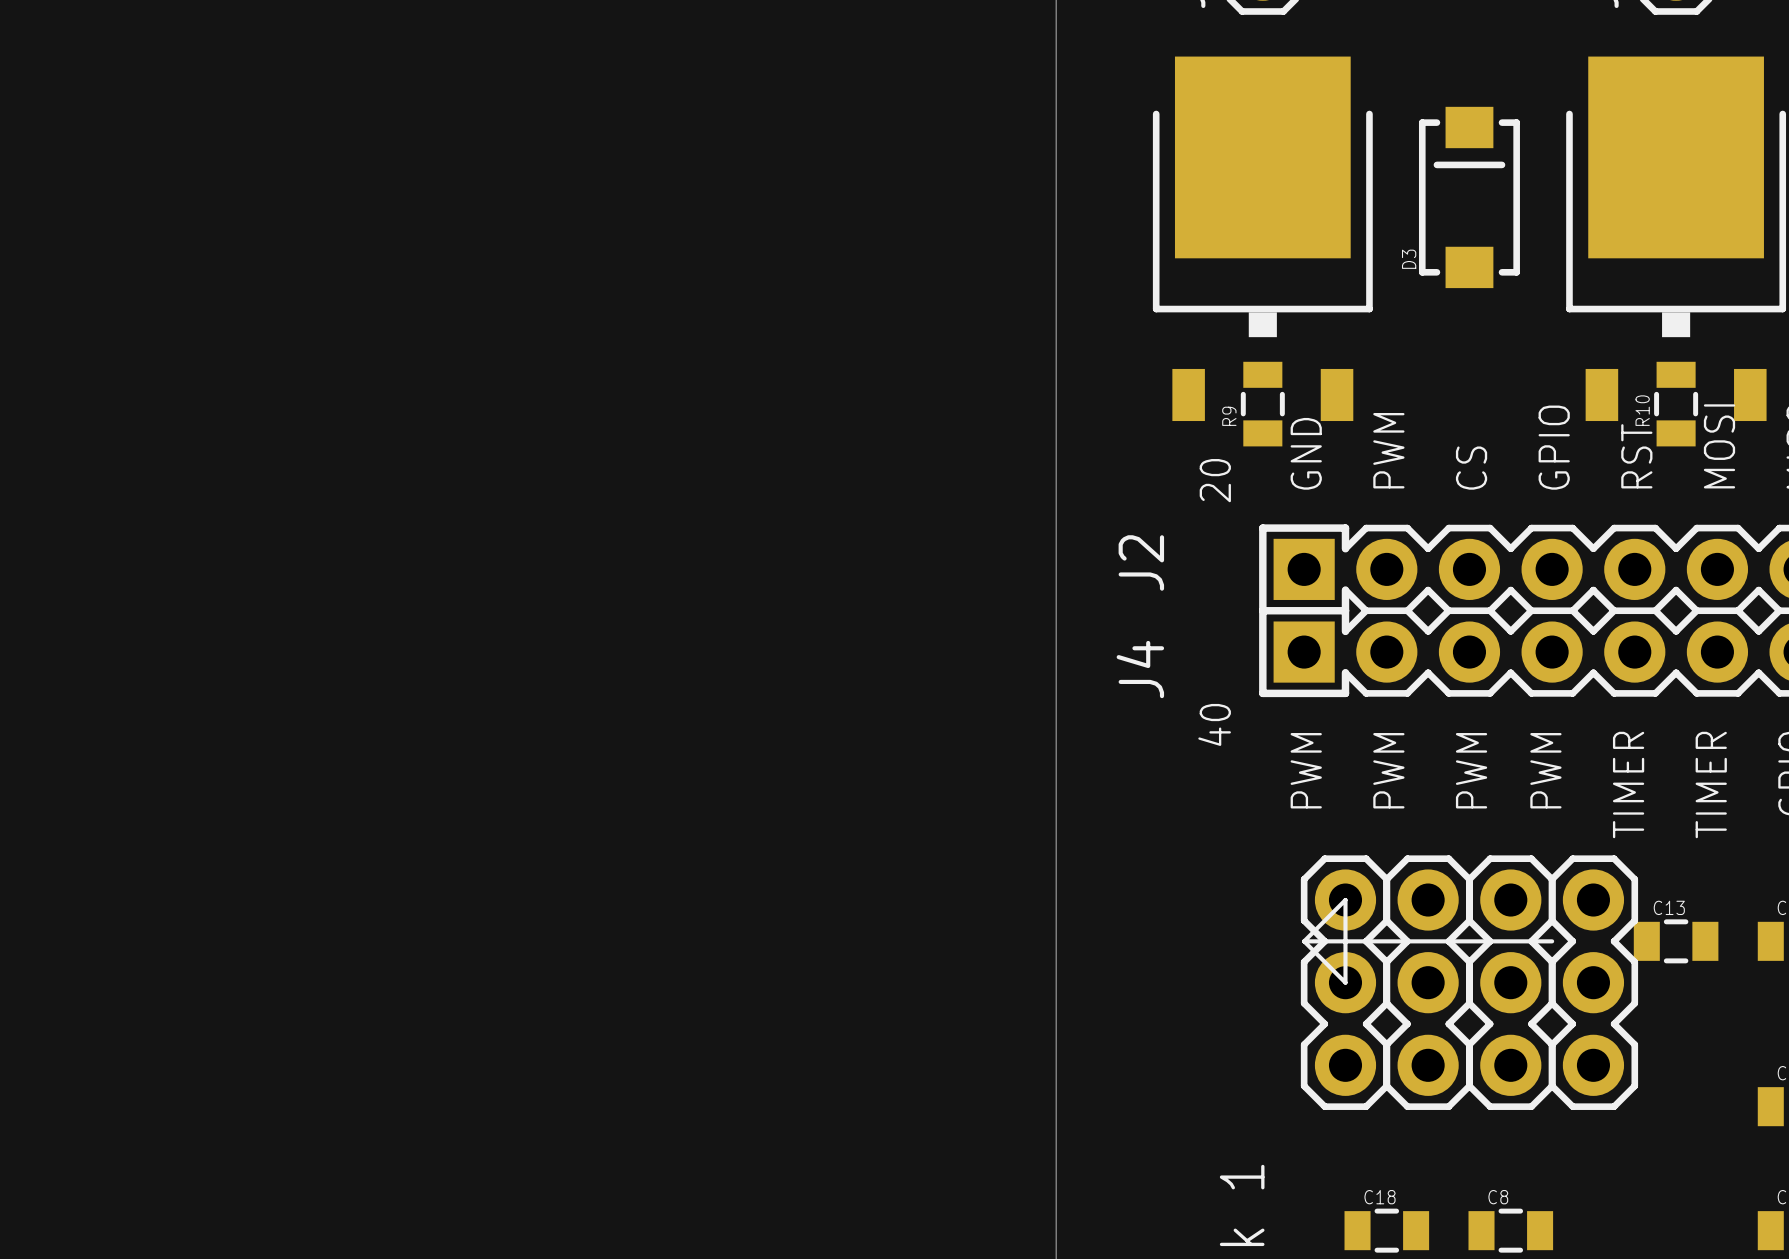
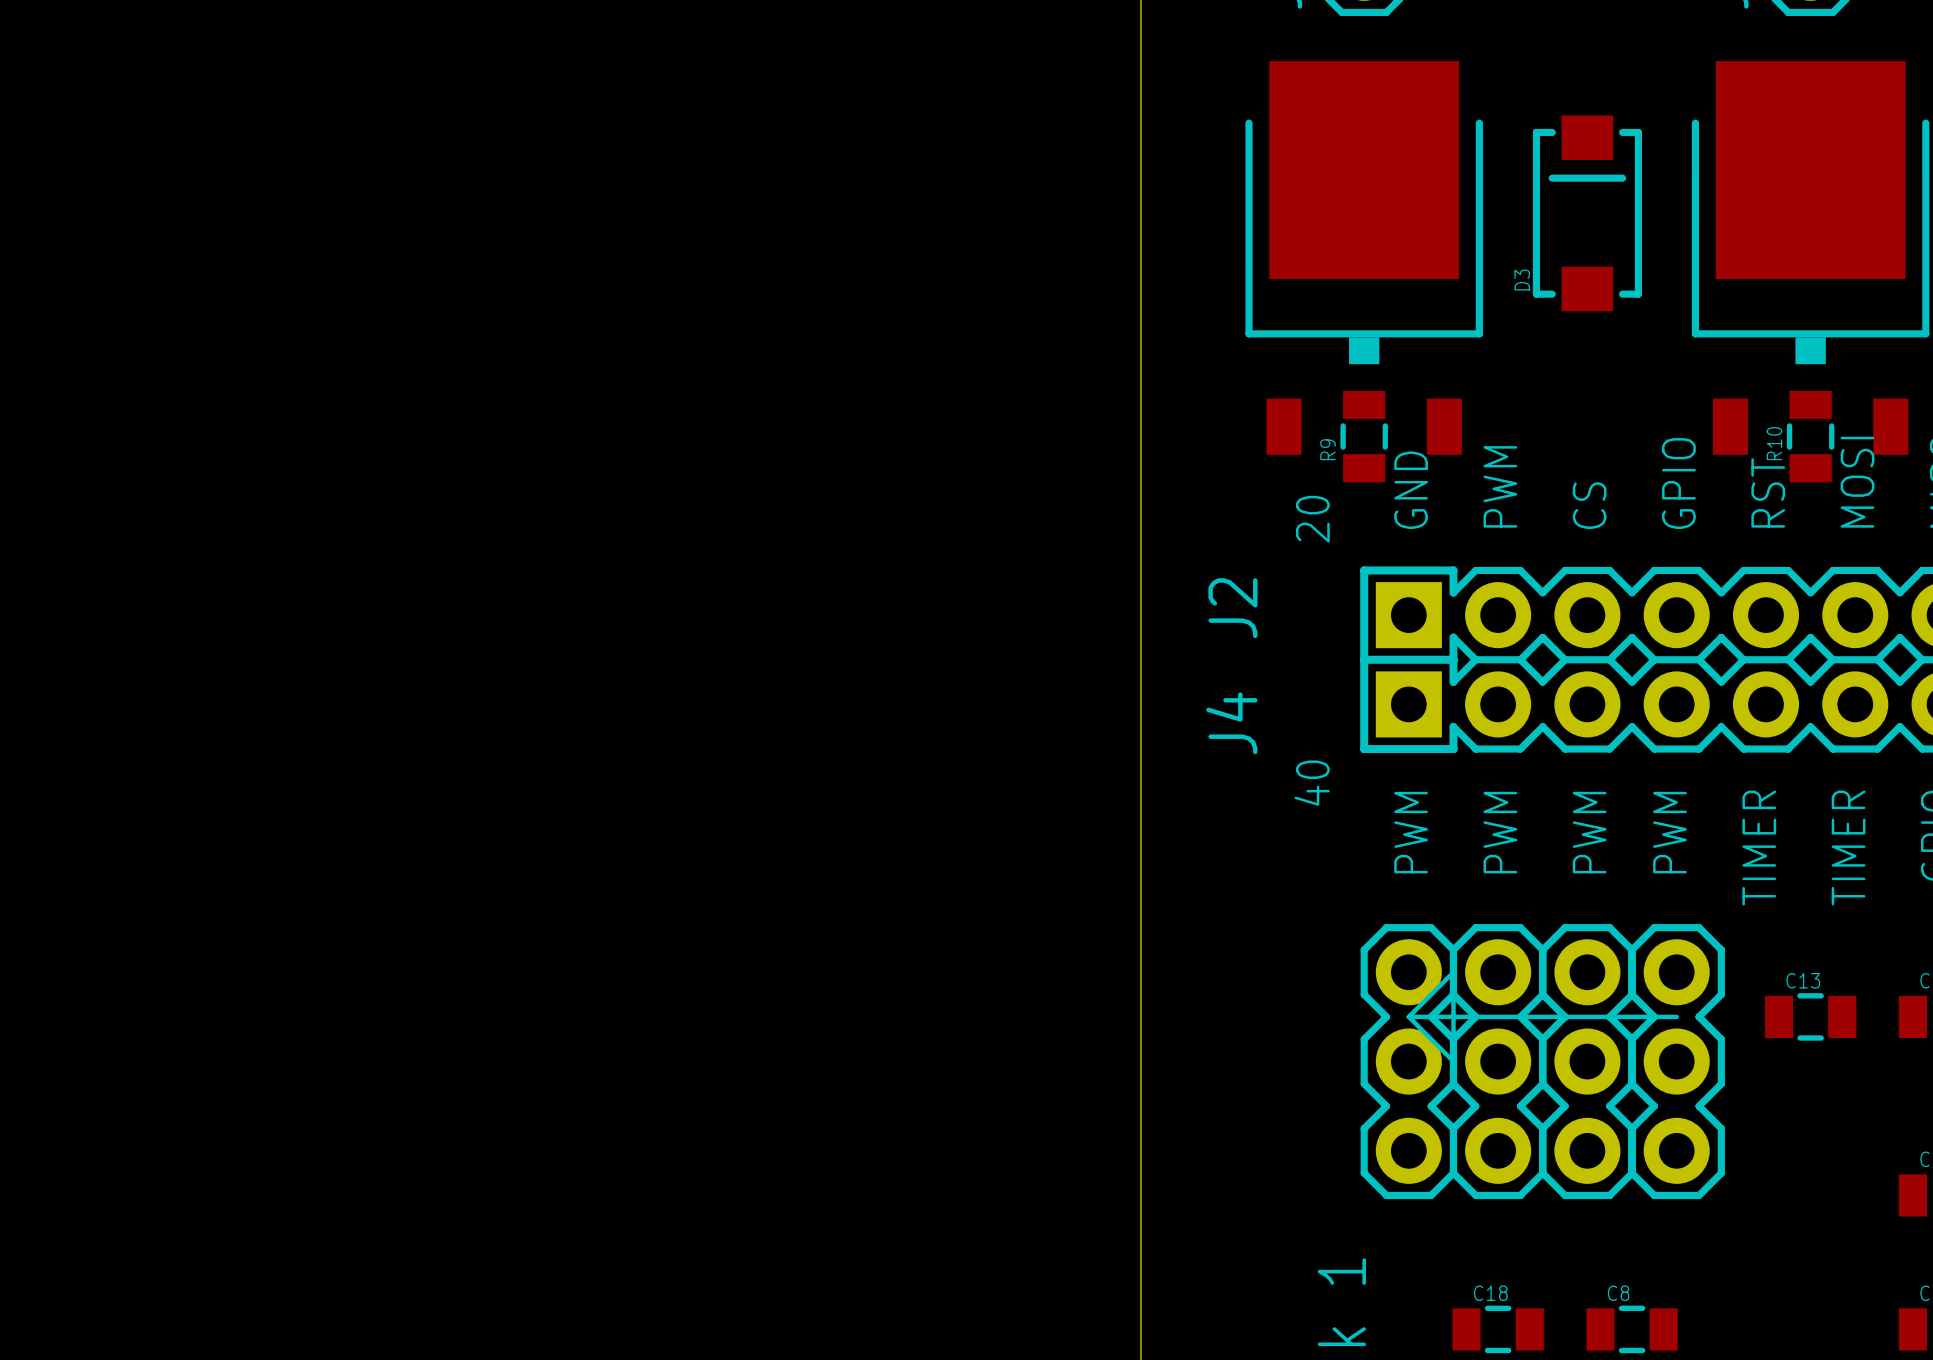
part: none -> (1408, 1061)
part: (1345, 982) -> none
part: none -> (1498, 1061)
part: (1428, 982) -> none
part: none -> (1587, 1061)
part: (1510, 982) -> none
part: none -> (1676, 1061)
part: (1593, 982) -> none

